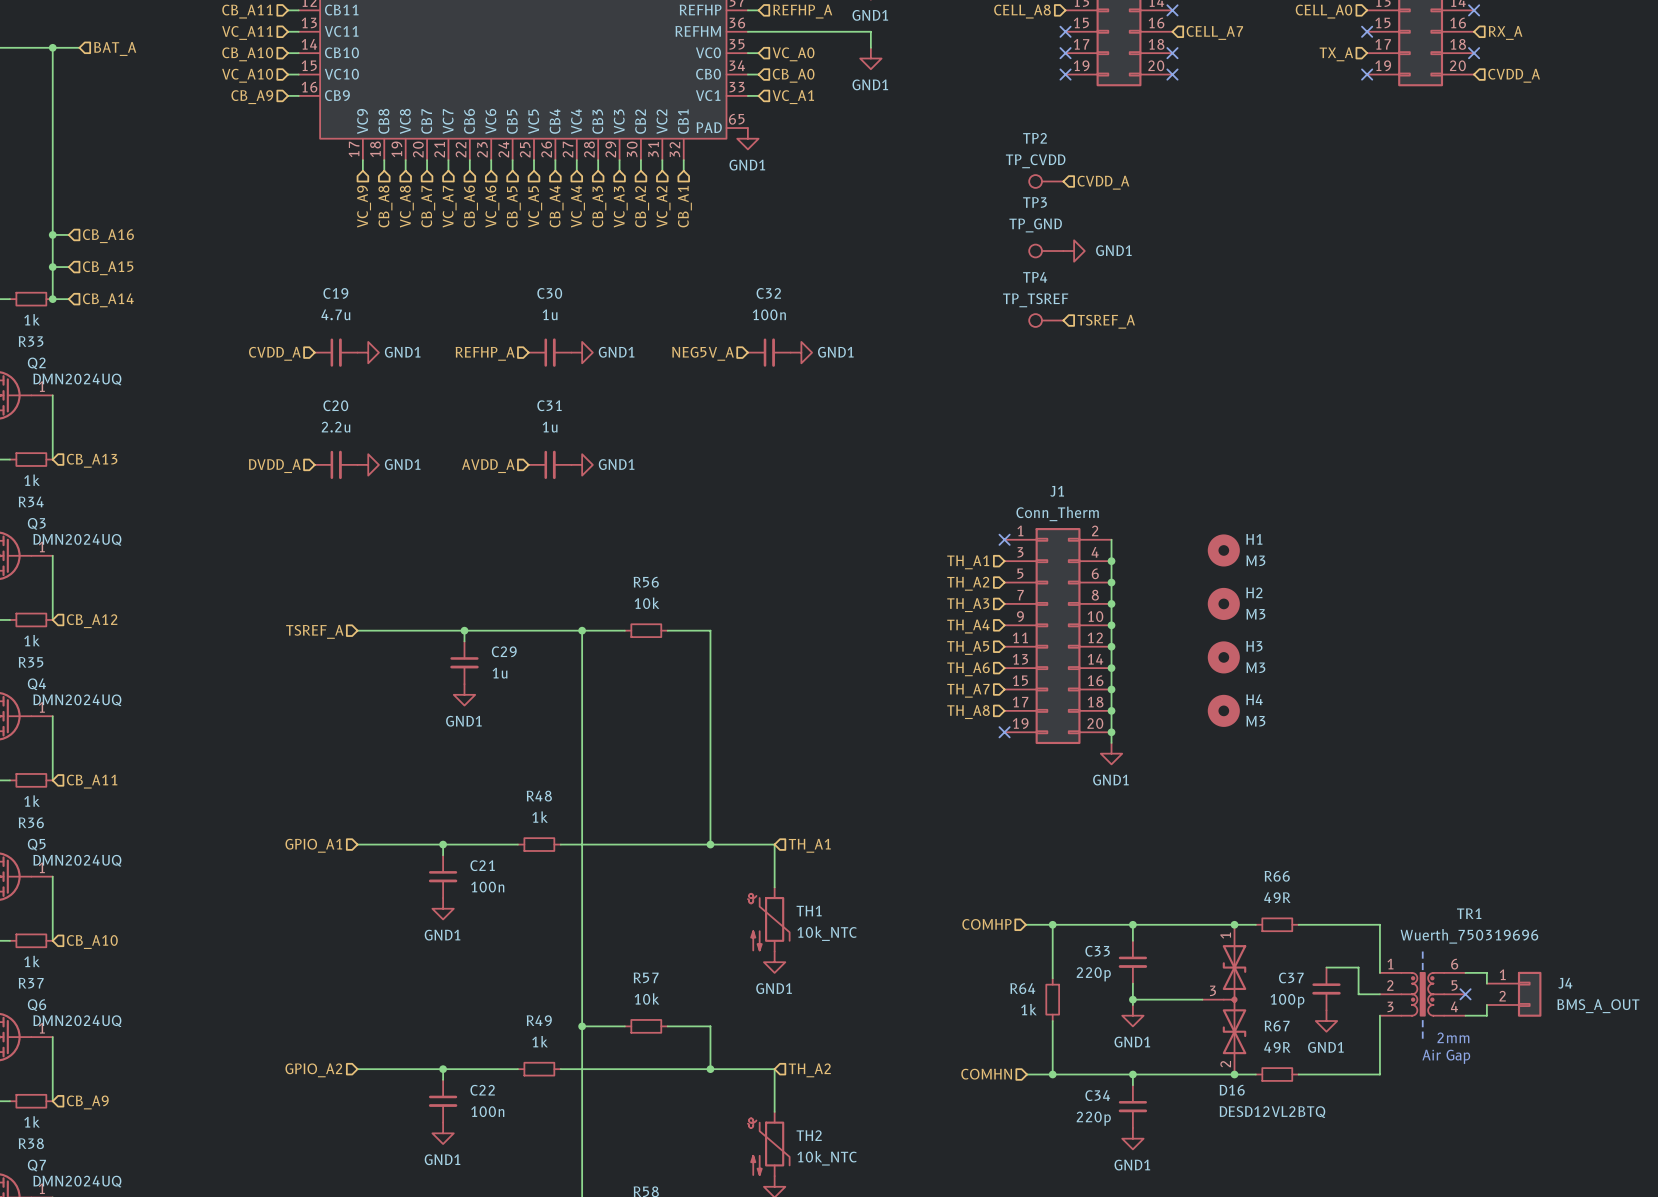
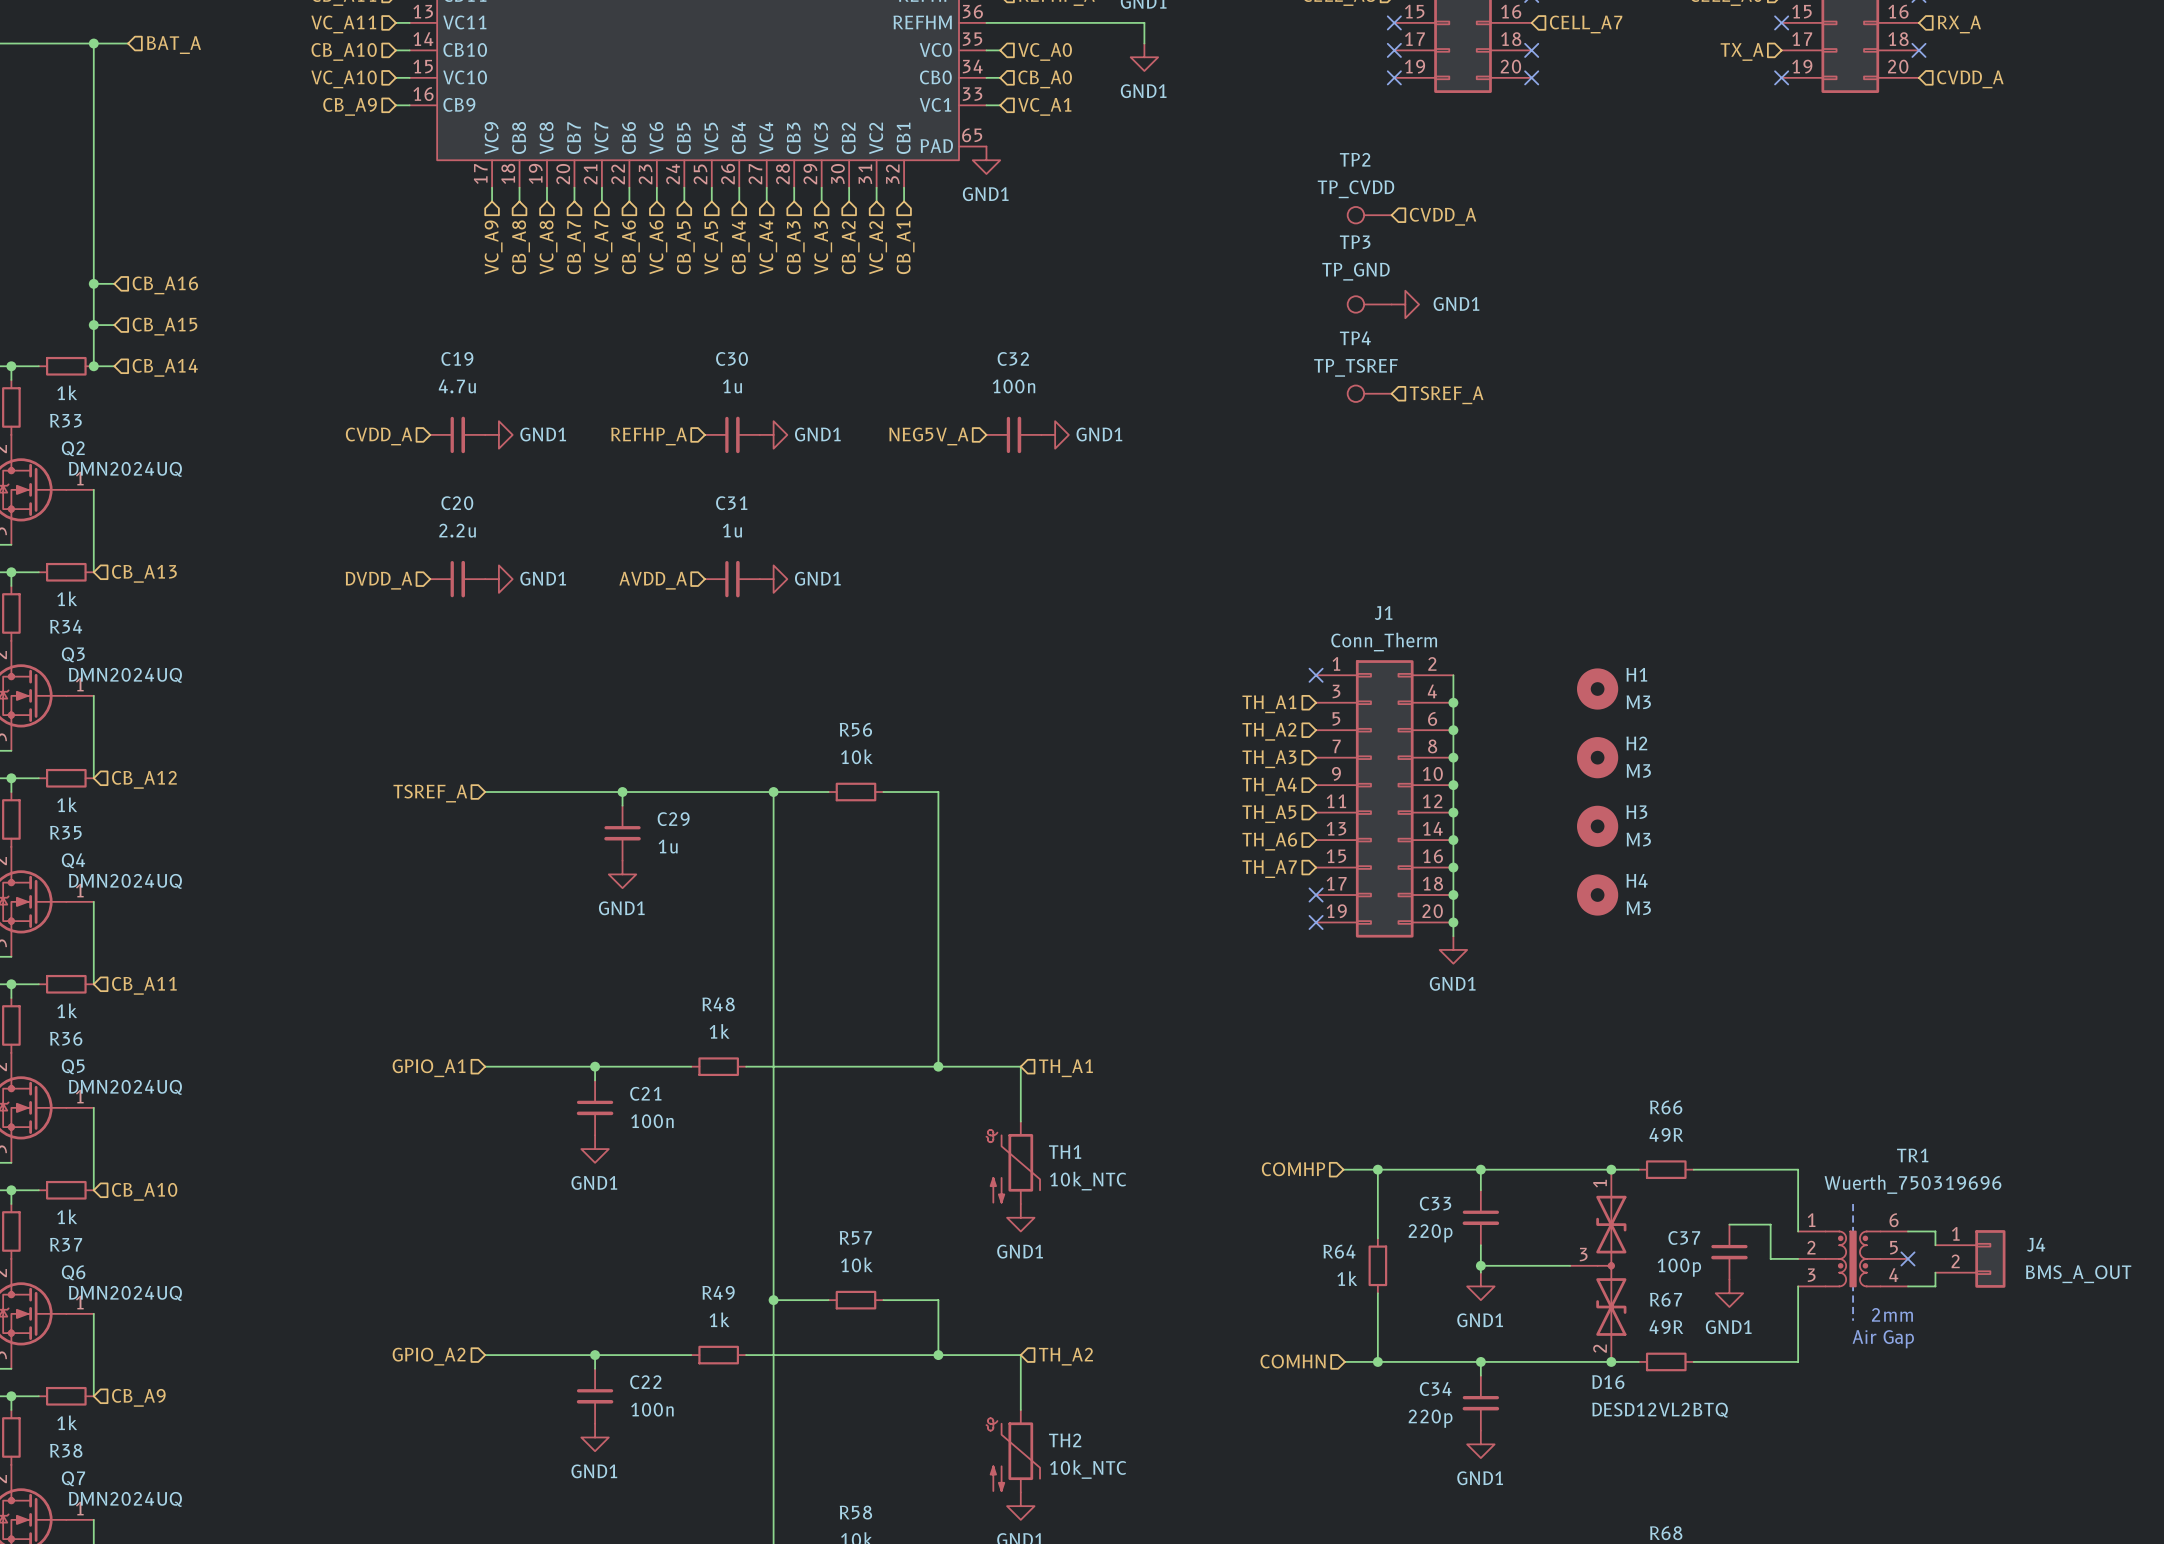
no-connect mark: none -> (1316, 895)
hierarchical label: TH_A8 (968, 712) -> none

